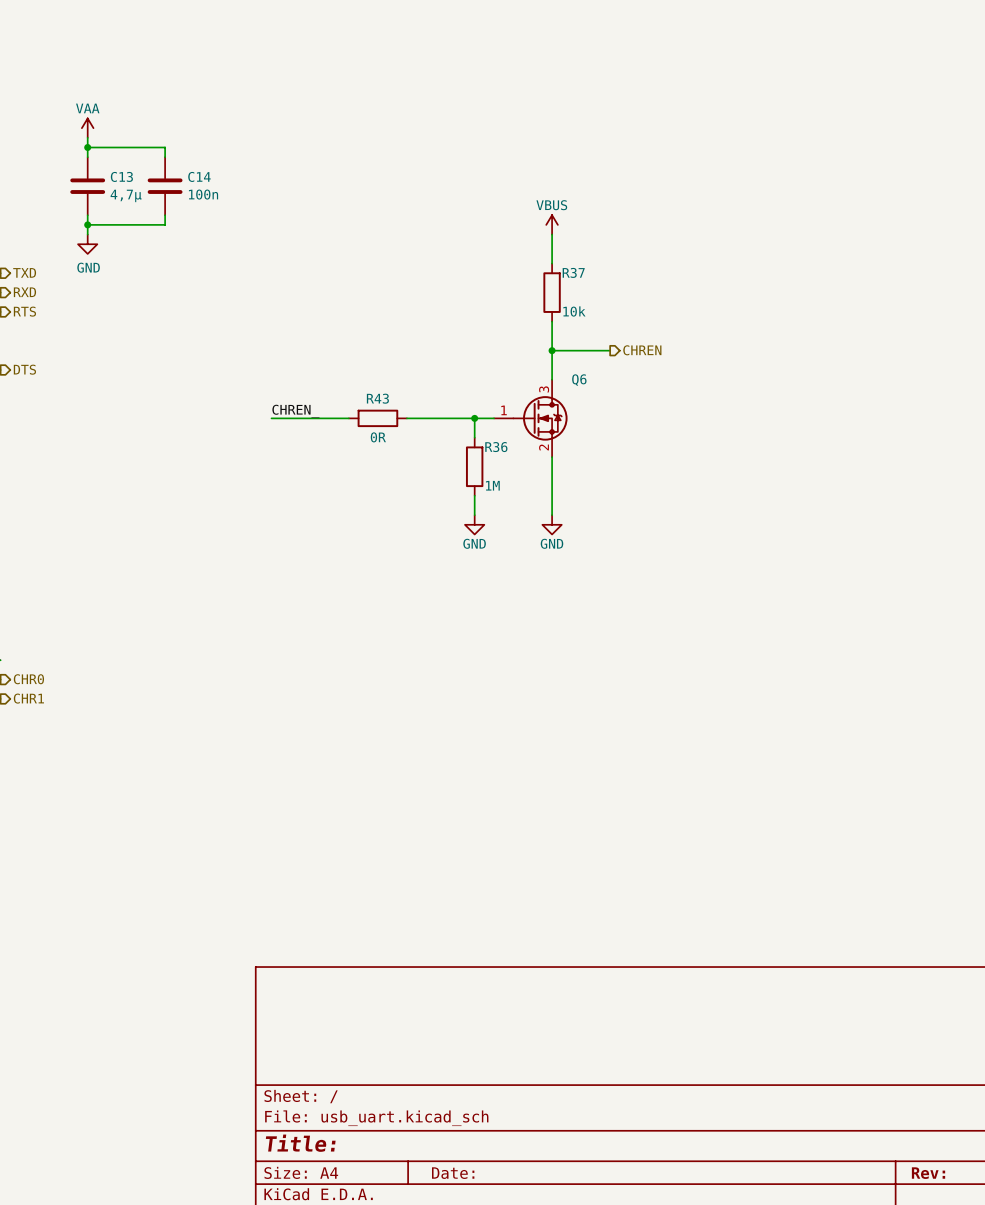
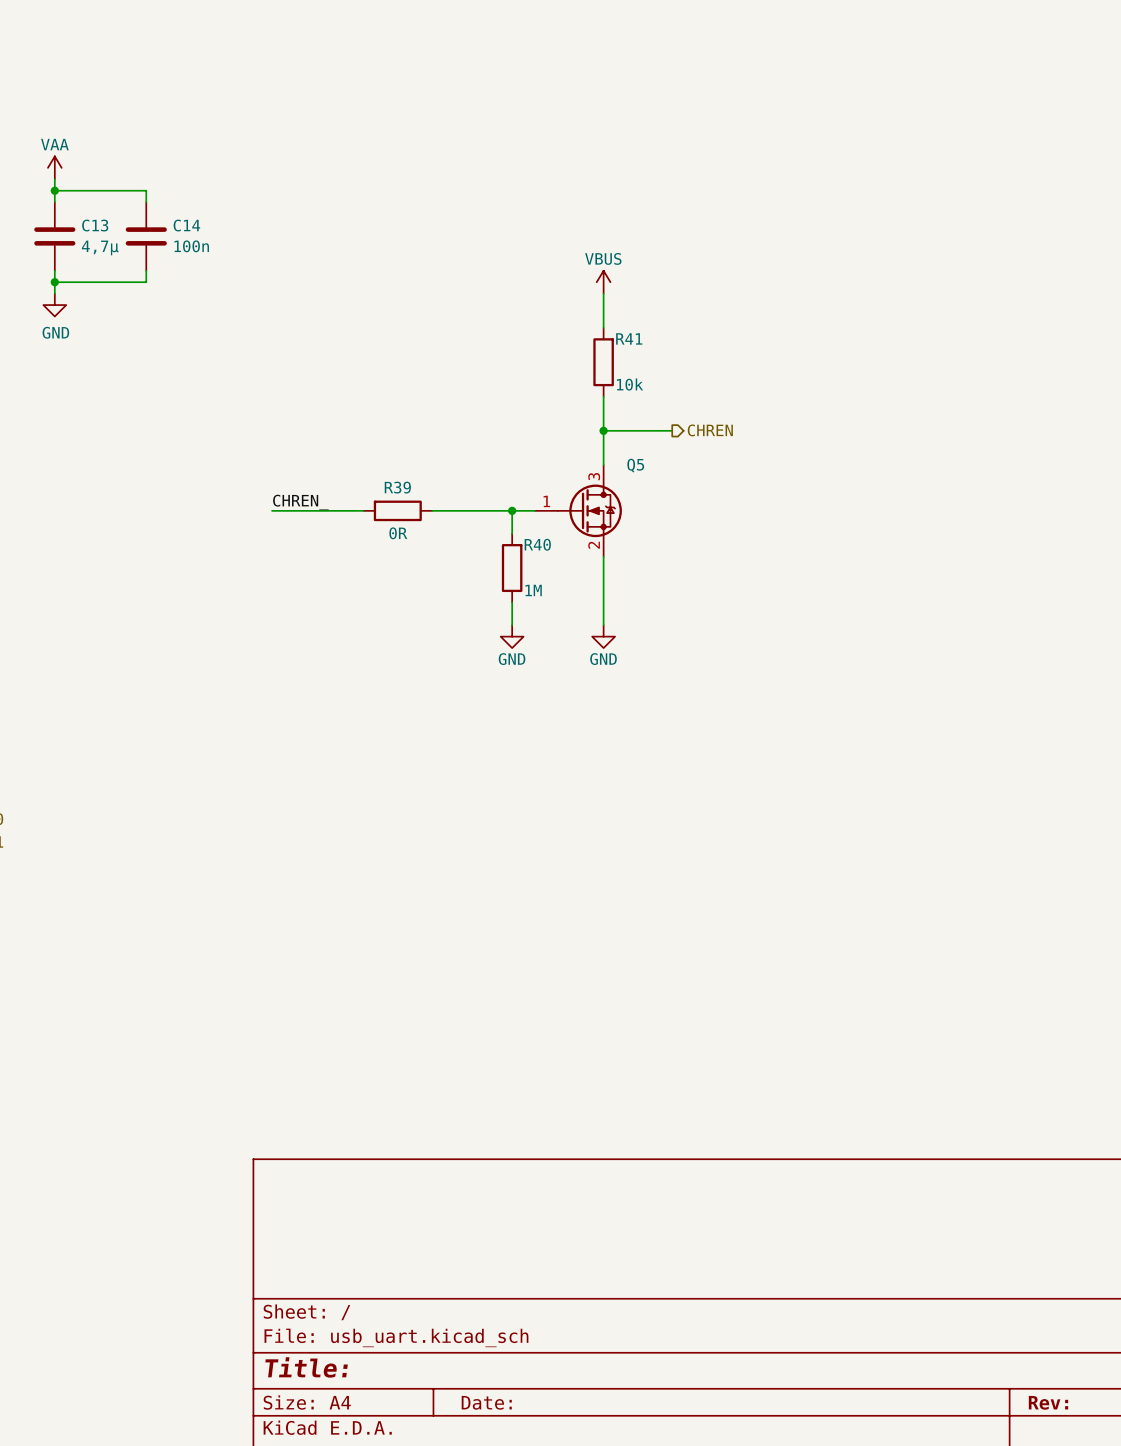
R37 name: R37 (573, 272) -> R41 (629, 338)
Q6 name: Q6 (579, 380) -> Q5 (635, 465)
R43 name: R43 (377, 398) -> R39 (397, 487)
R36 name: R36 (496, 447) -> R40 (537, 544)

